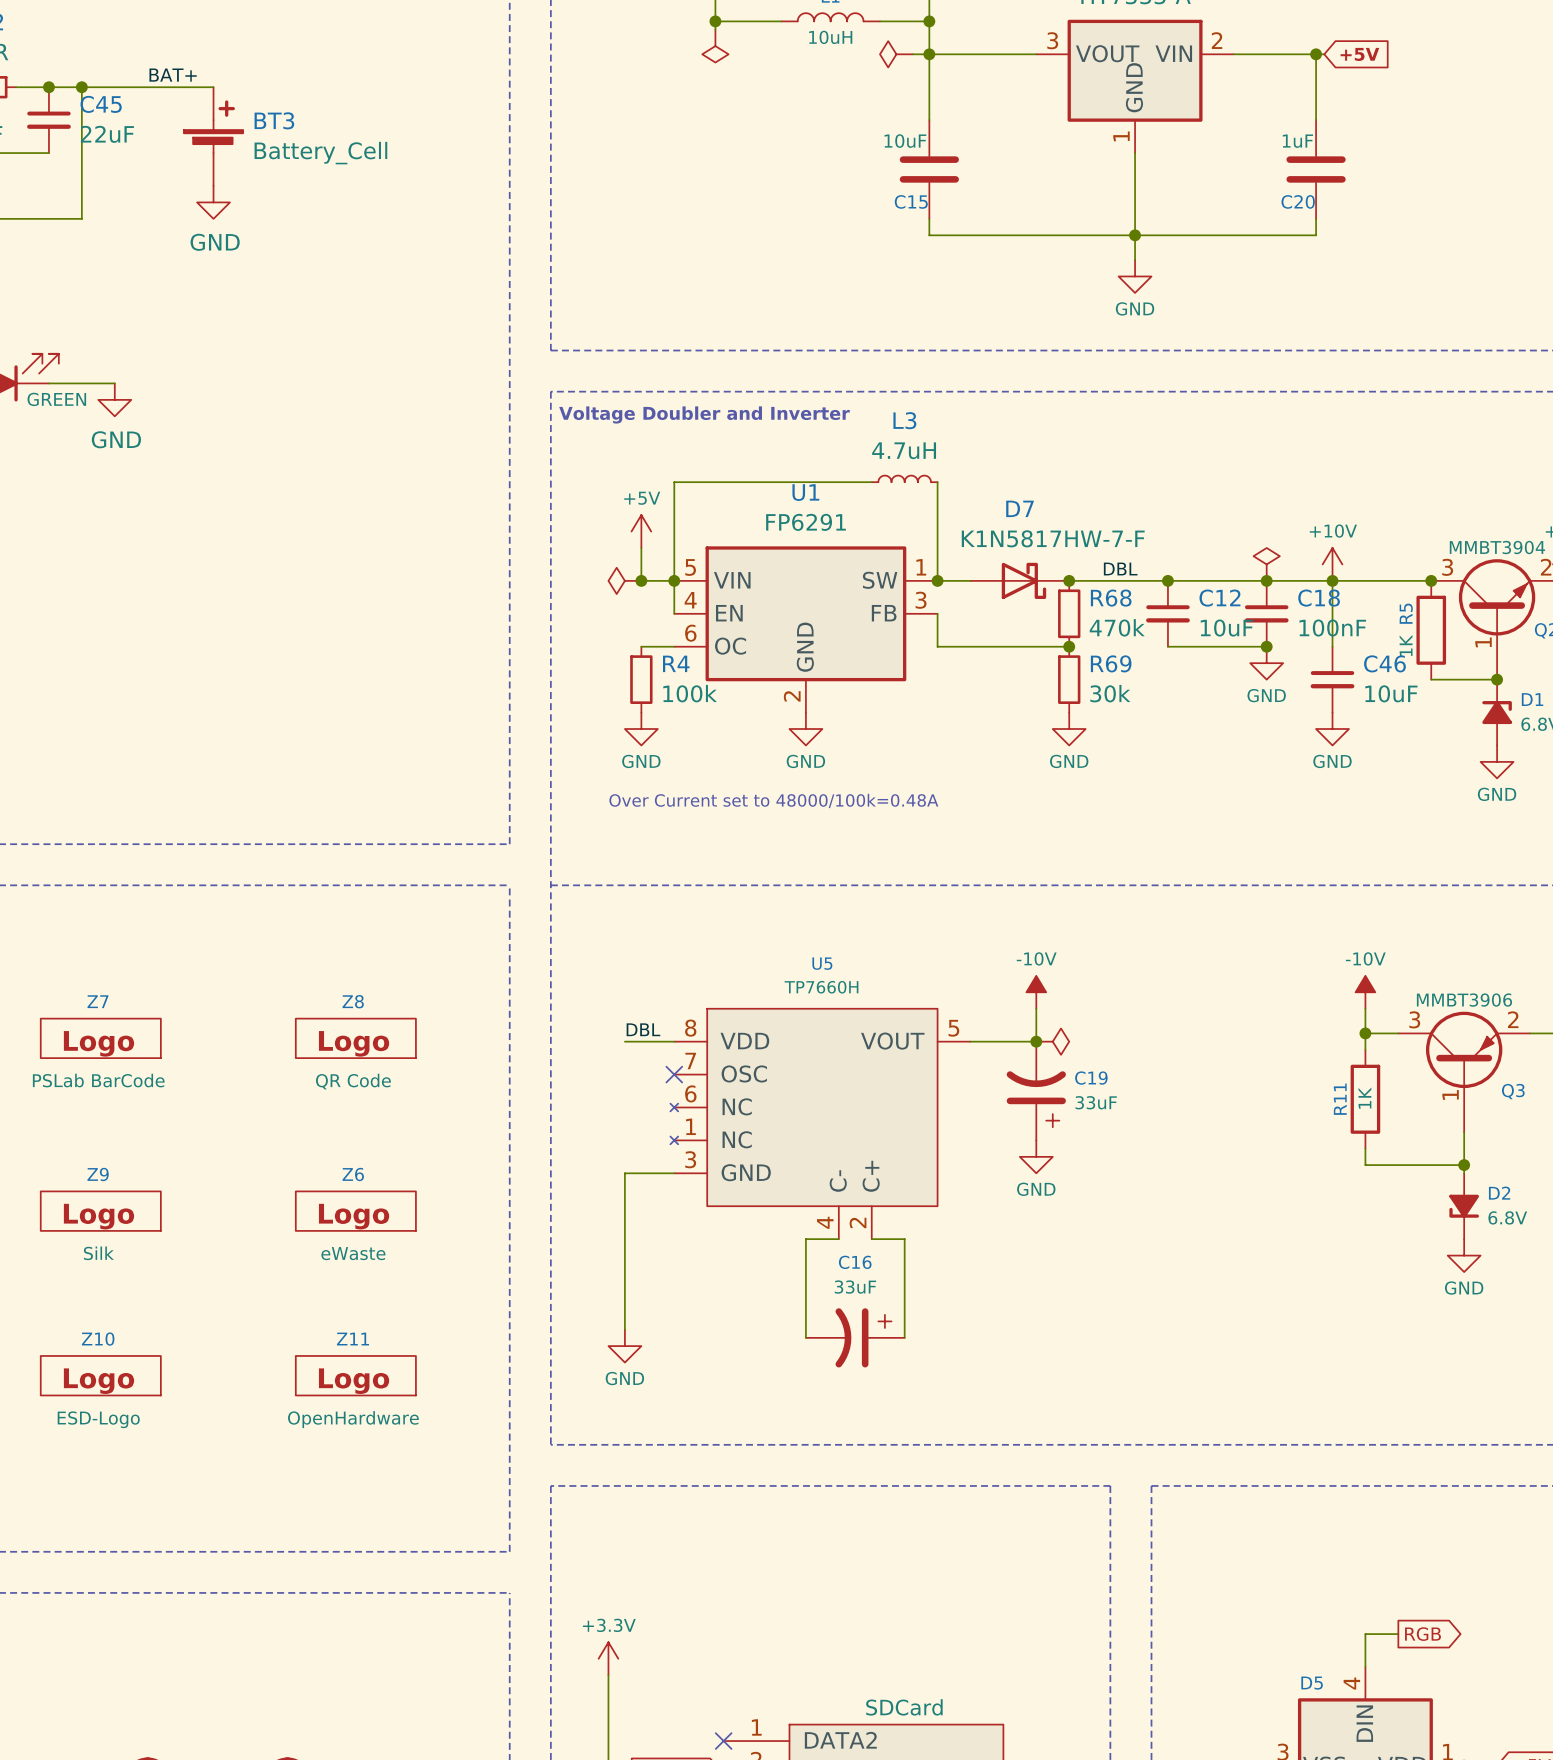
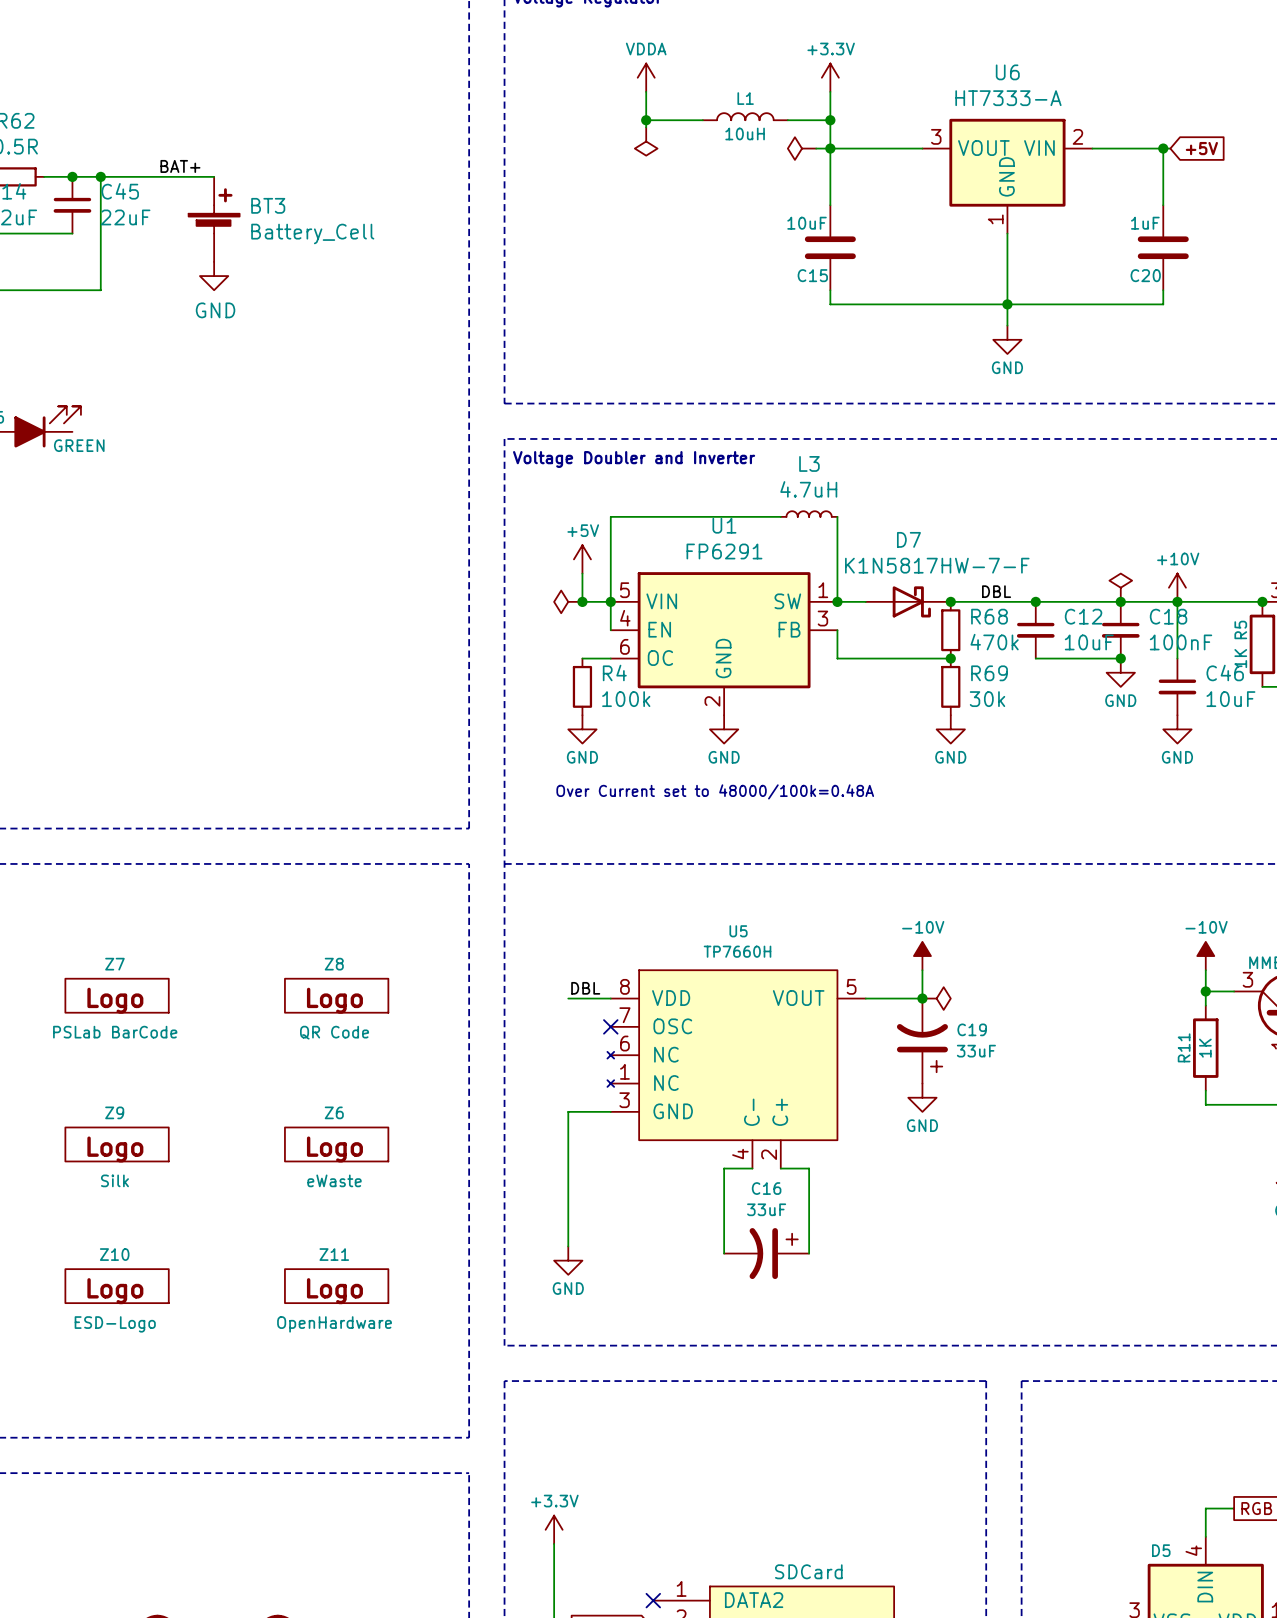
wire: (48, 383) (114, 383) -> none
power symbol: GND (114, 399) -> none

